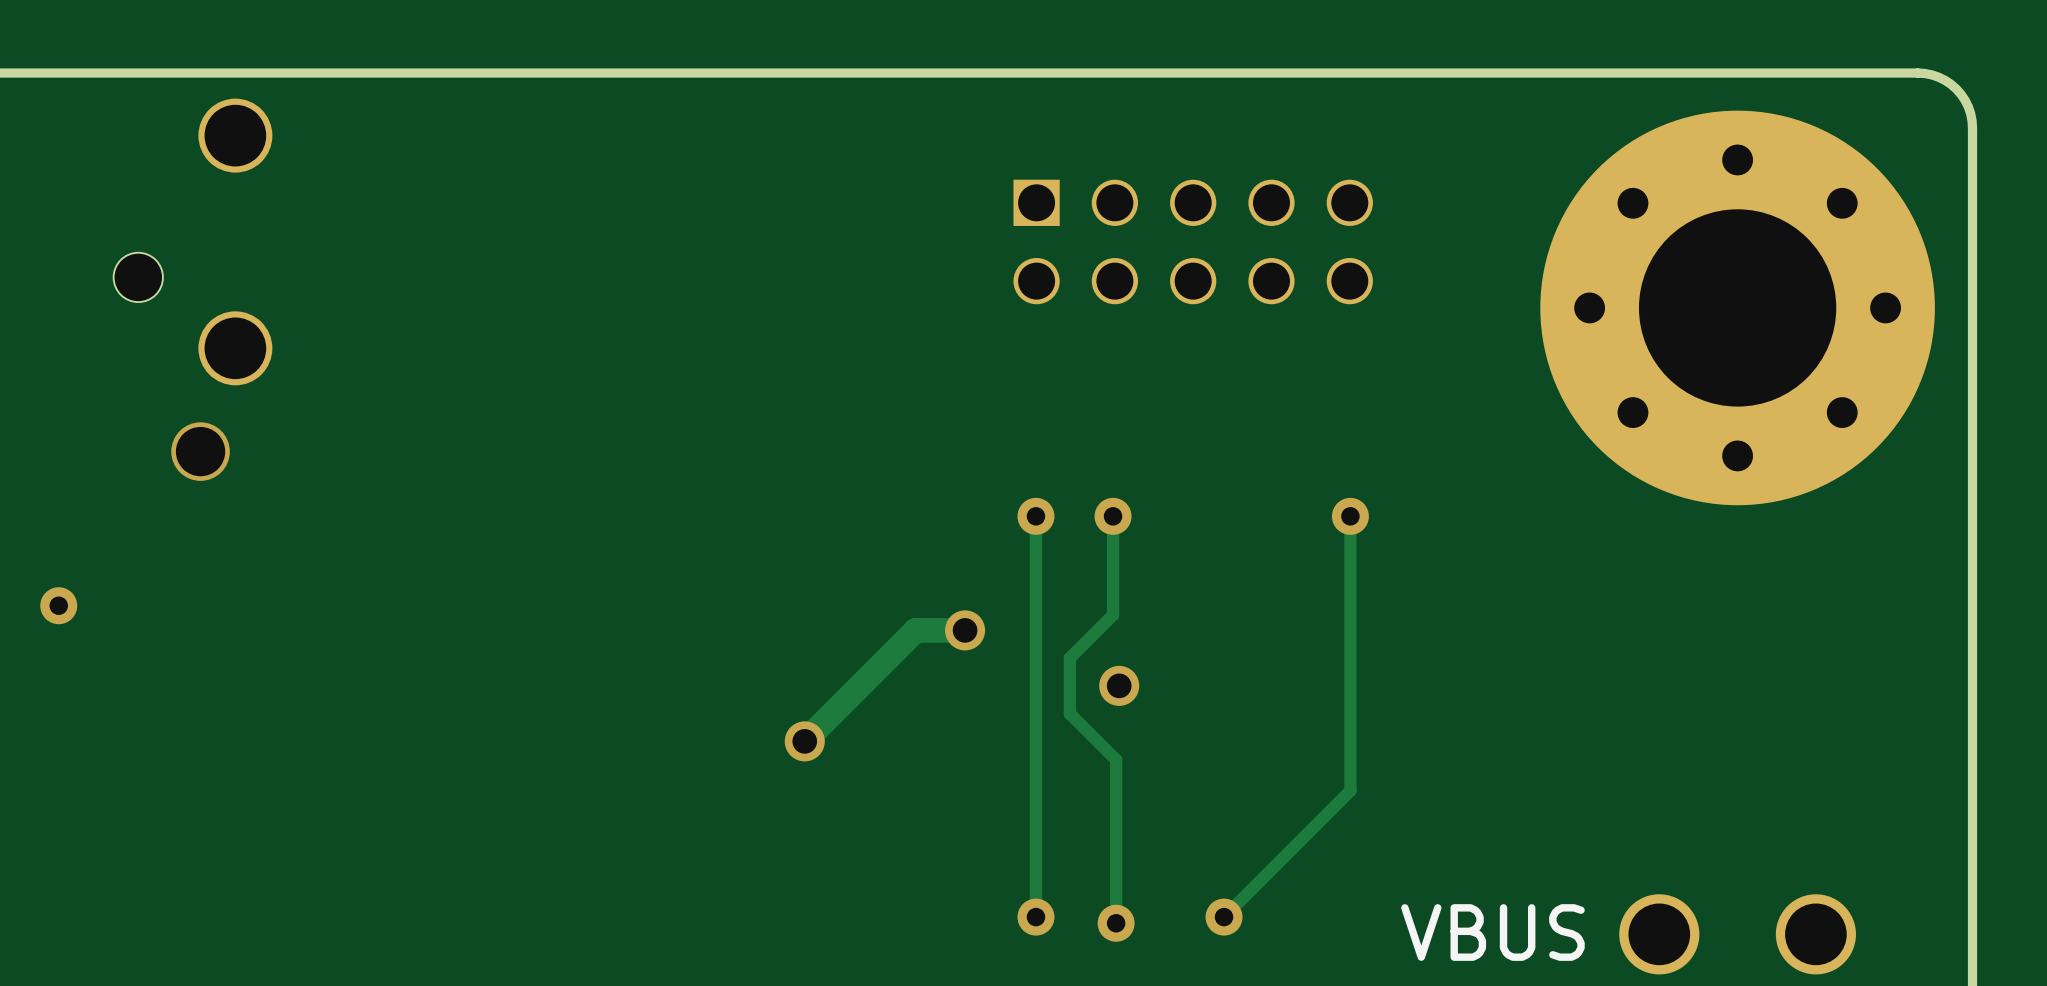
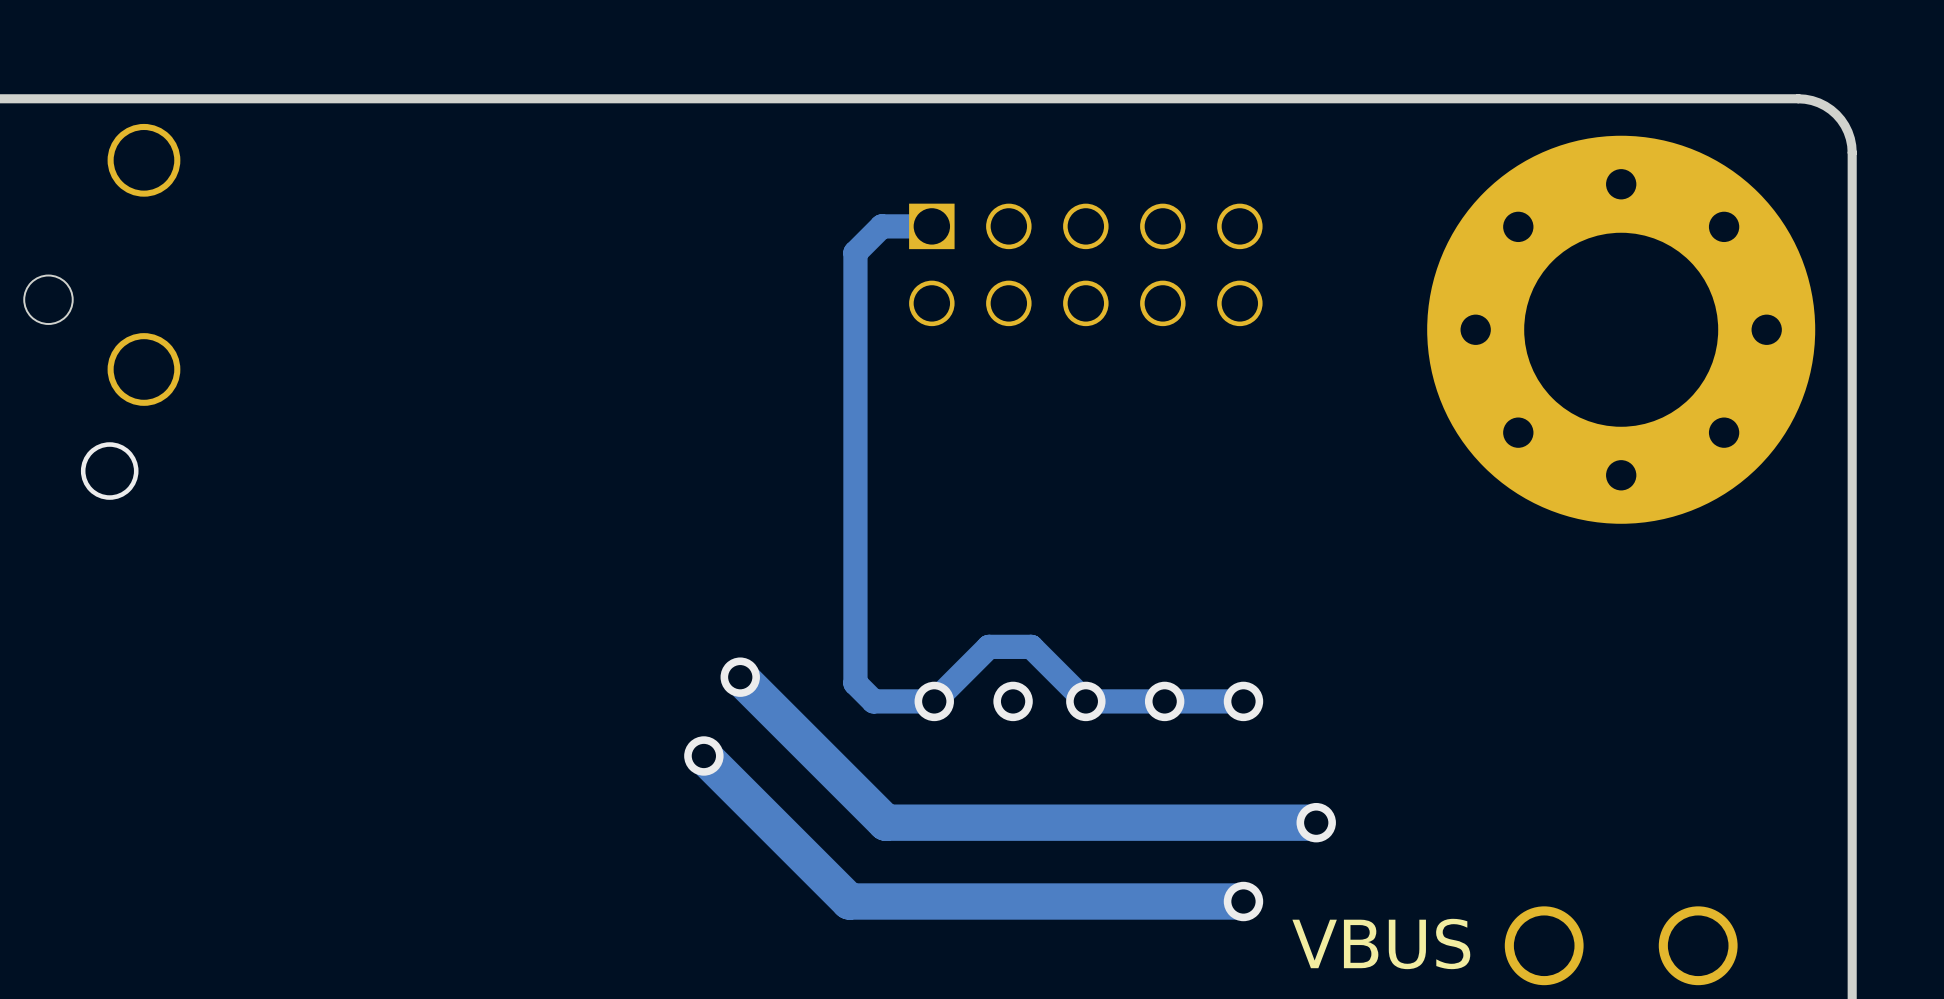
track: none -> (931, 226) (881, 226) (855, 252) (855, 683) (873, 701) (934, 701) (988, 646) (1031, 646) (1085, 701) (1243, 701)
track: (1035, 516) (1035, 917) -> none
via: (1035, 516) -> none
track: (1113, 516) (1113, 614) (1069, 658) (1069, 713) (1116, 759) (1116, 923) -> none
via: (1113, 516) -> none
track: (1350, 516) (1350, 790) (1224, 917) -> none
via: (1350, 516) -> none
track: (965, 630) (915, 630) (804, 741) -> (1243, 901) (849, 901) (703, 755)
via: (965, 630) -> none
track: none -> (740, 677) (885, 822) (1316, 822)
via: none -> (740, 677)
via: none -> (934, 701)
via: none -> (1085, 701)
via: none -> (1164, 701)
via: none -> (1243, 701)
via: none -> (1316, 822)
via: none -> (1243, 901)
via: (1035, 917) -> none
via: (1224, 917) -> none
via: (1116, 923) -> none

